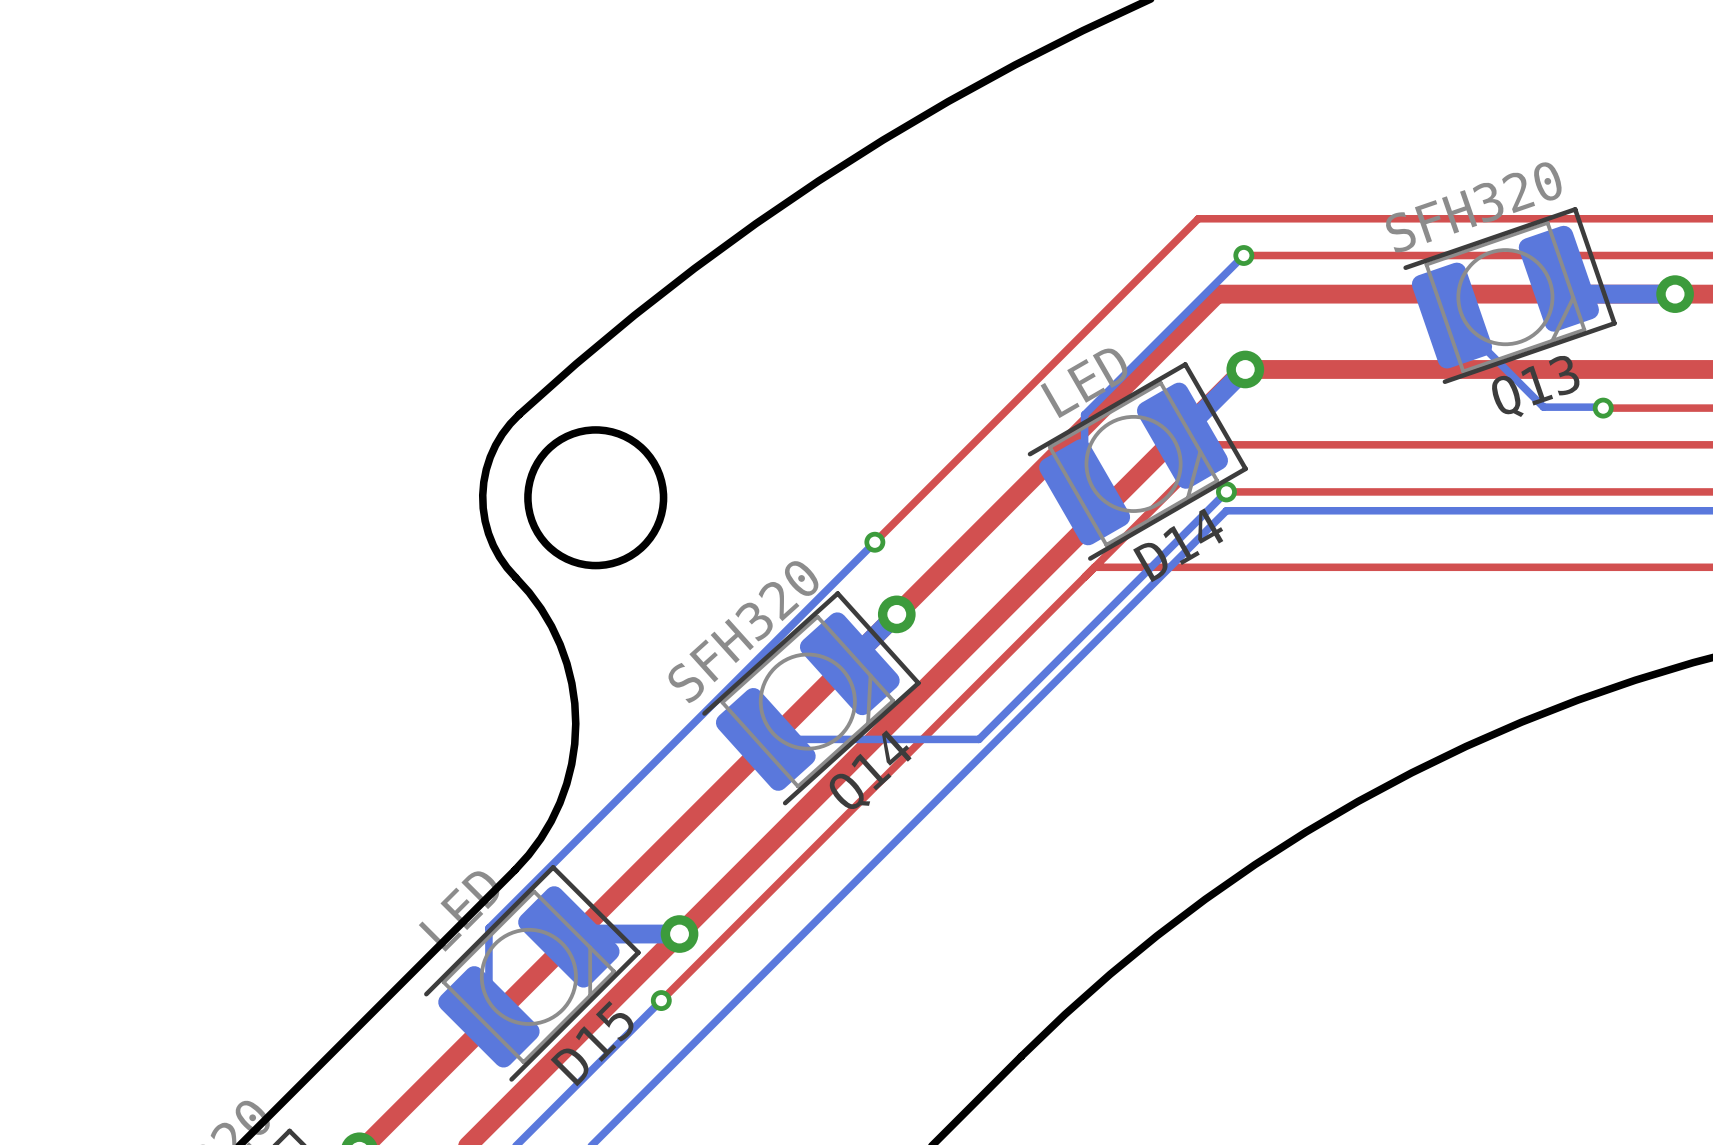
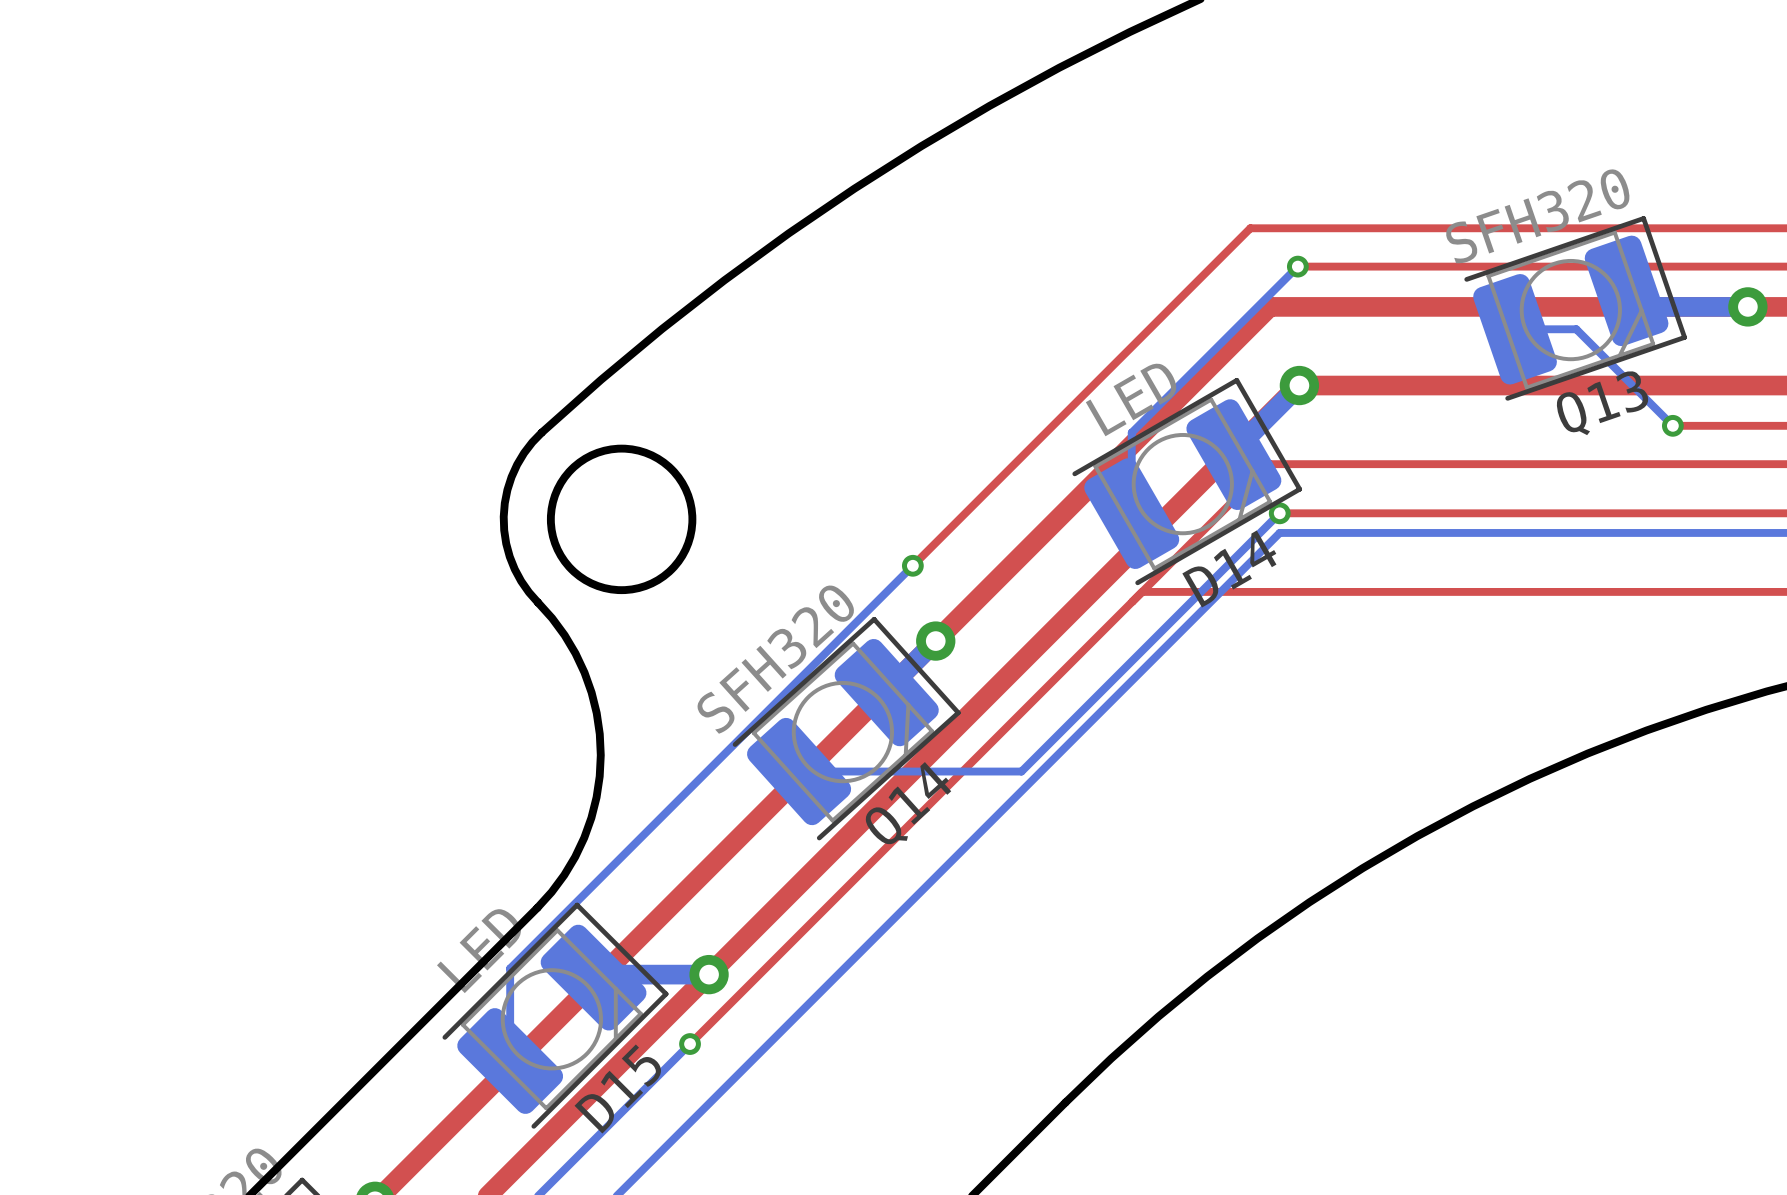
bottom track: (1451, 315) (1543, 407) (1602, 407) -> (1515, 329) (1576, 329) (1671, 424)

